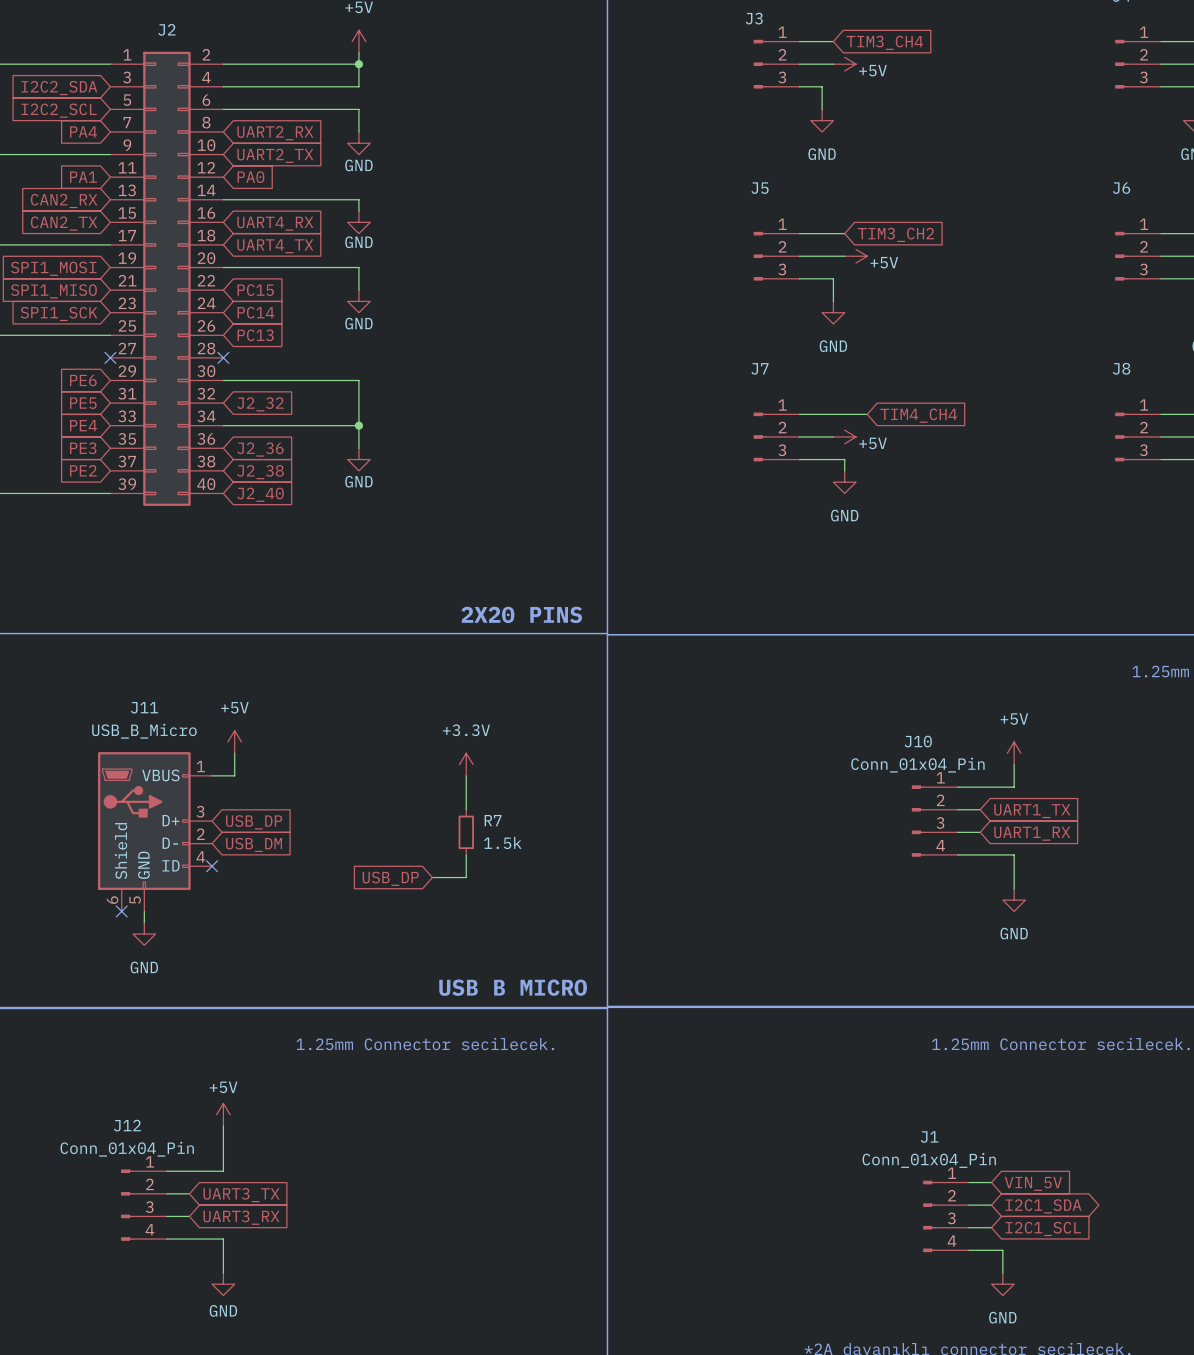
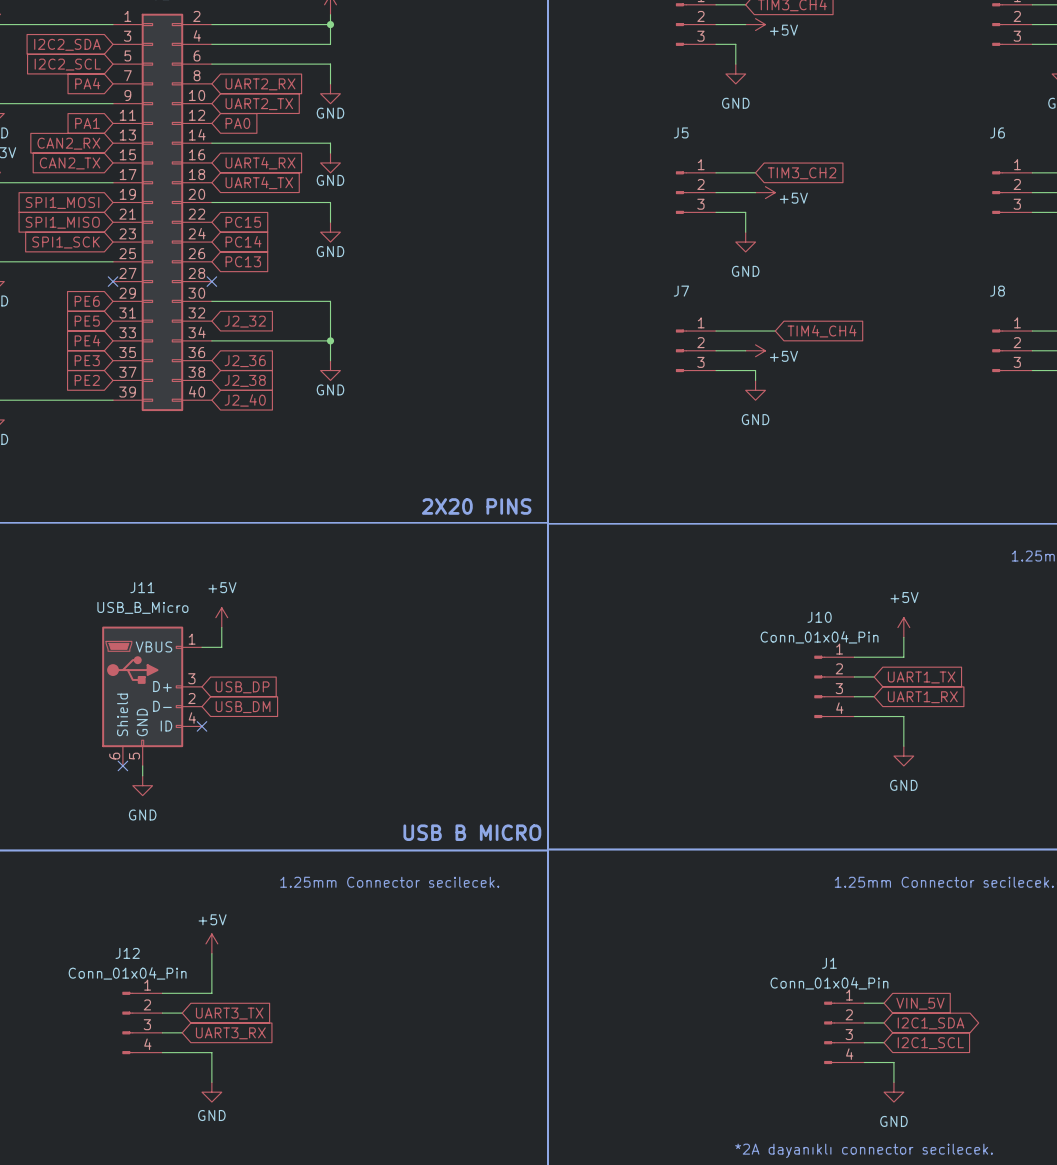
power symbol: +3.3V (466, 764) -> none
wire: (466, 775) (466, 809) -> none
R7: 1.5k (466, 832) -> none
wire: (466, 854) (466, 877) (432, 877) -> none
global label: USB_DP (390, 878) -> none

